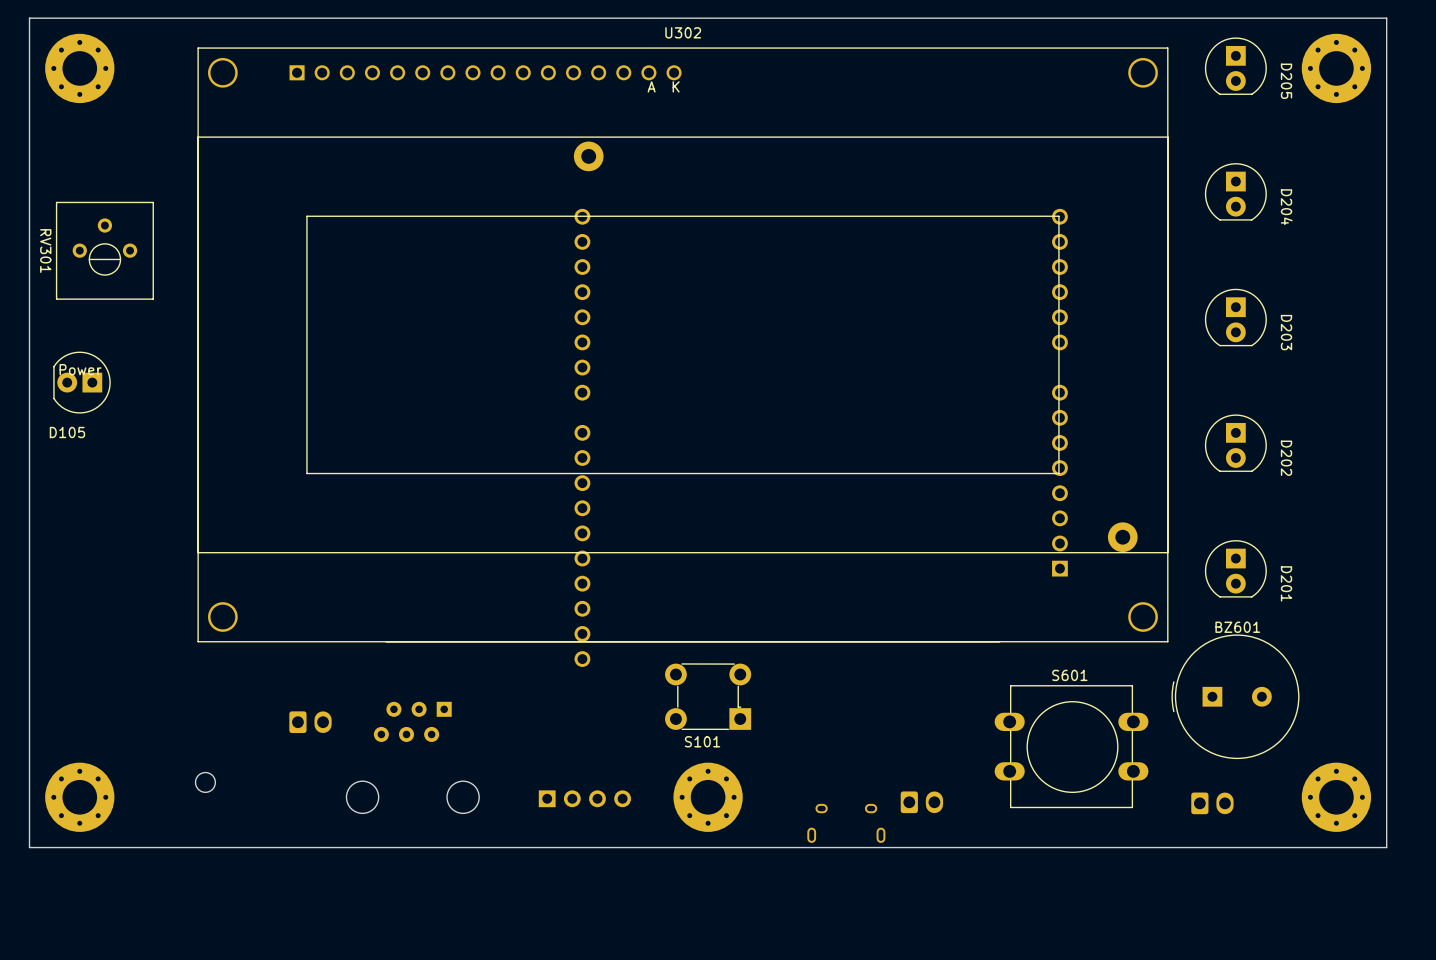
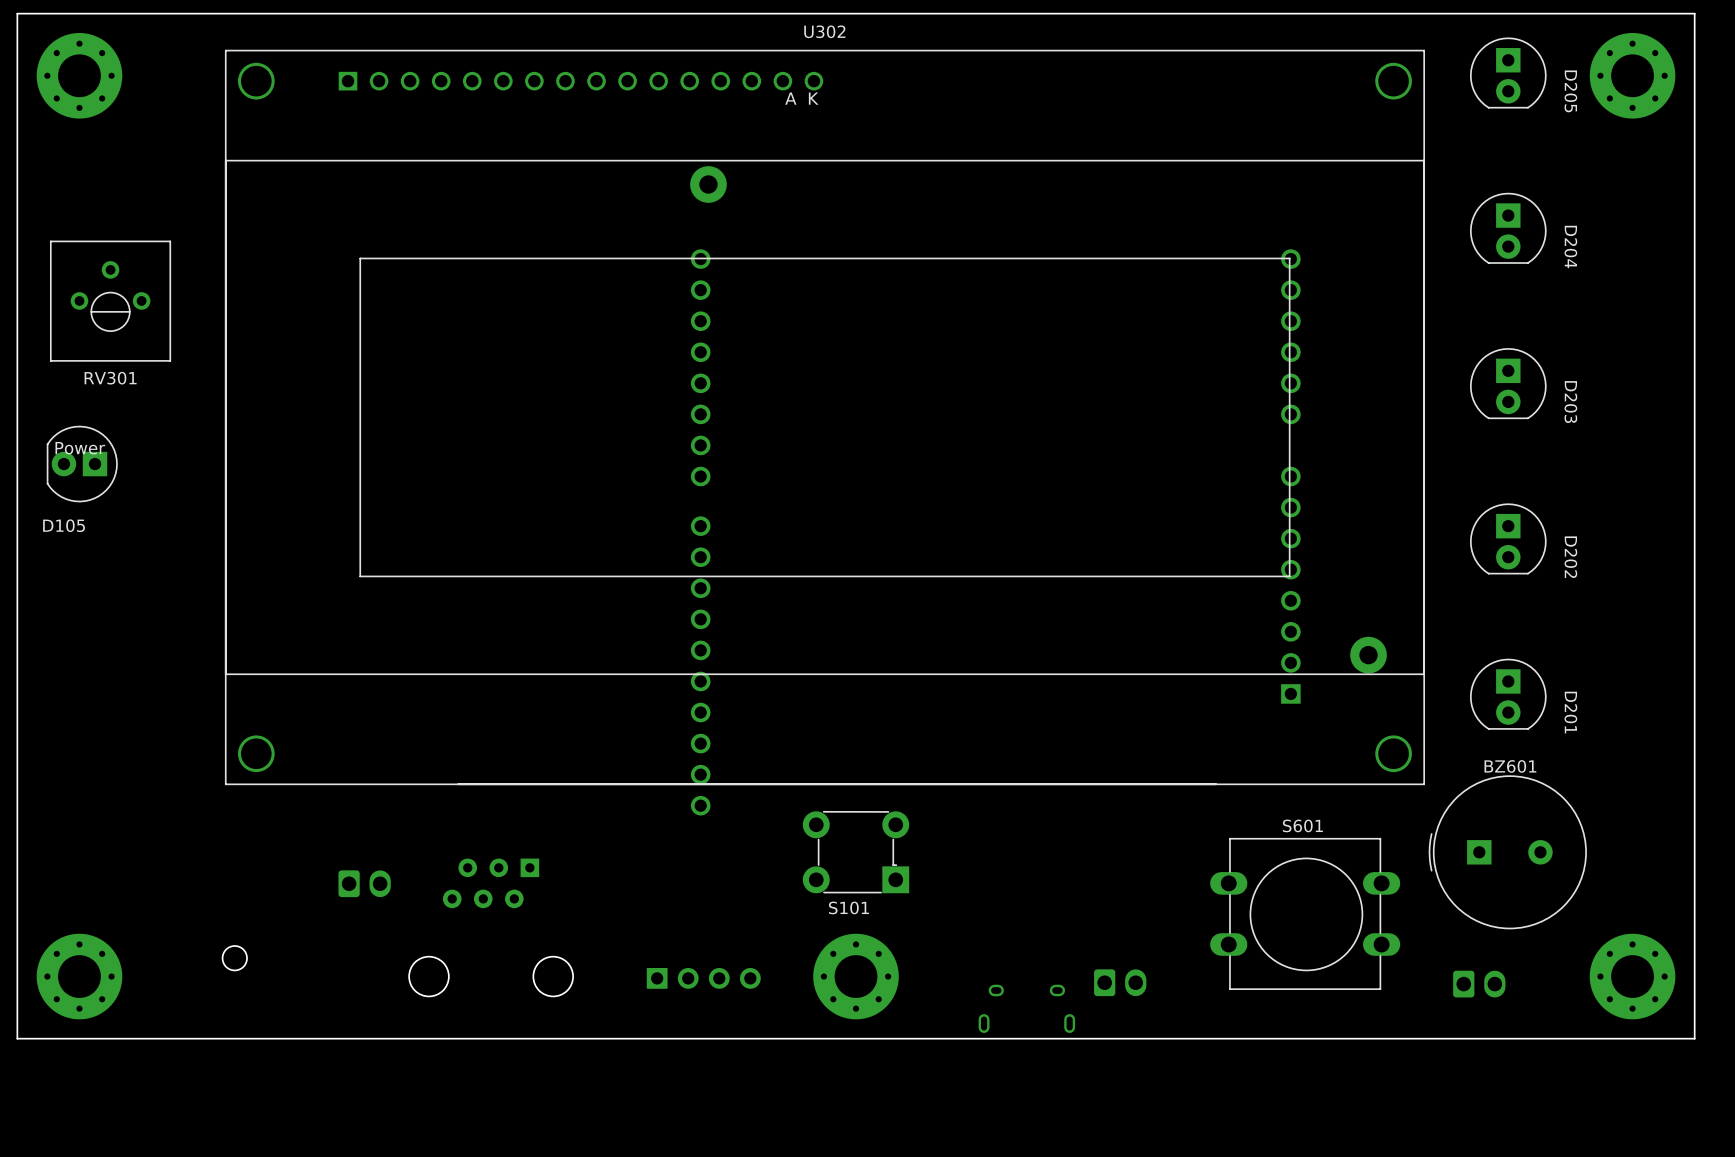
RV301 name rotation: 0° (45, 251) -> 90° counterclockwise (110, 378)
RV301 name position: RV301 (45, 251) -> RV301 (110, 378)

